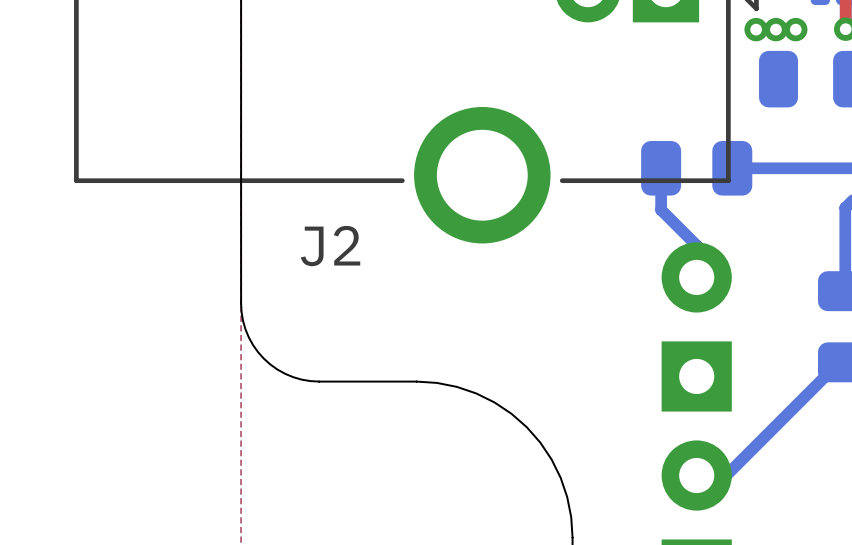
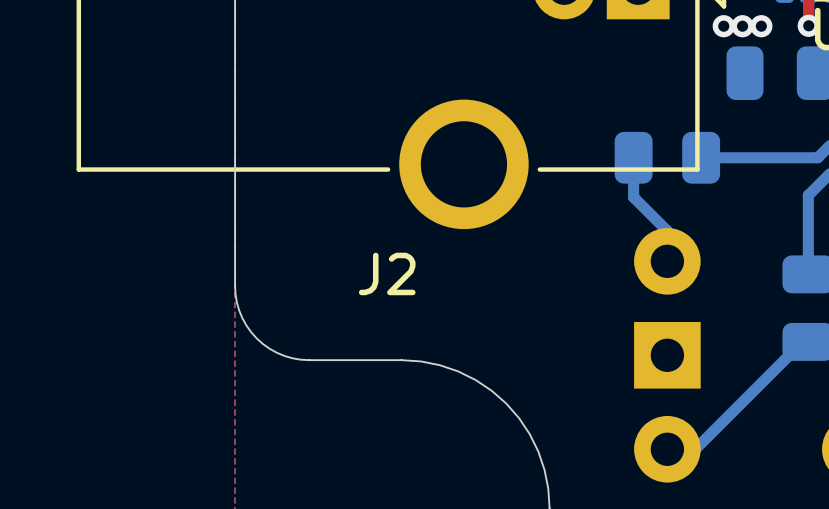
J2 name position: J2 (330, 246) -> J2 (387, 273)

